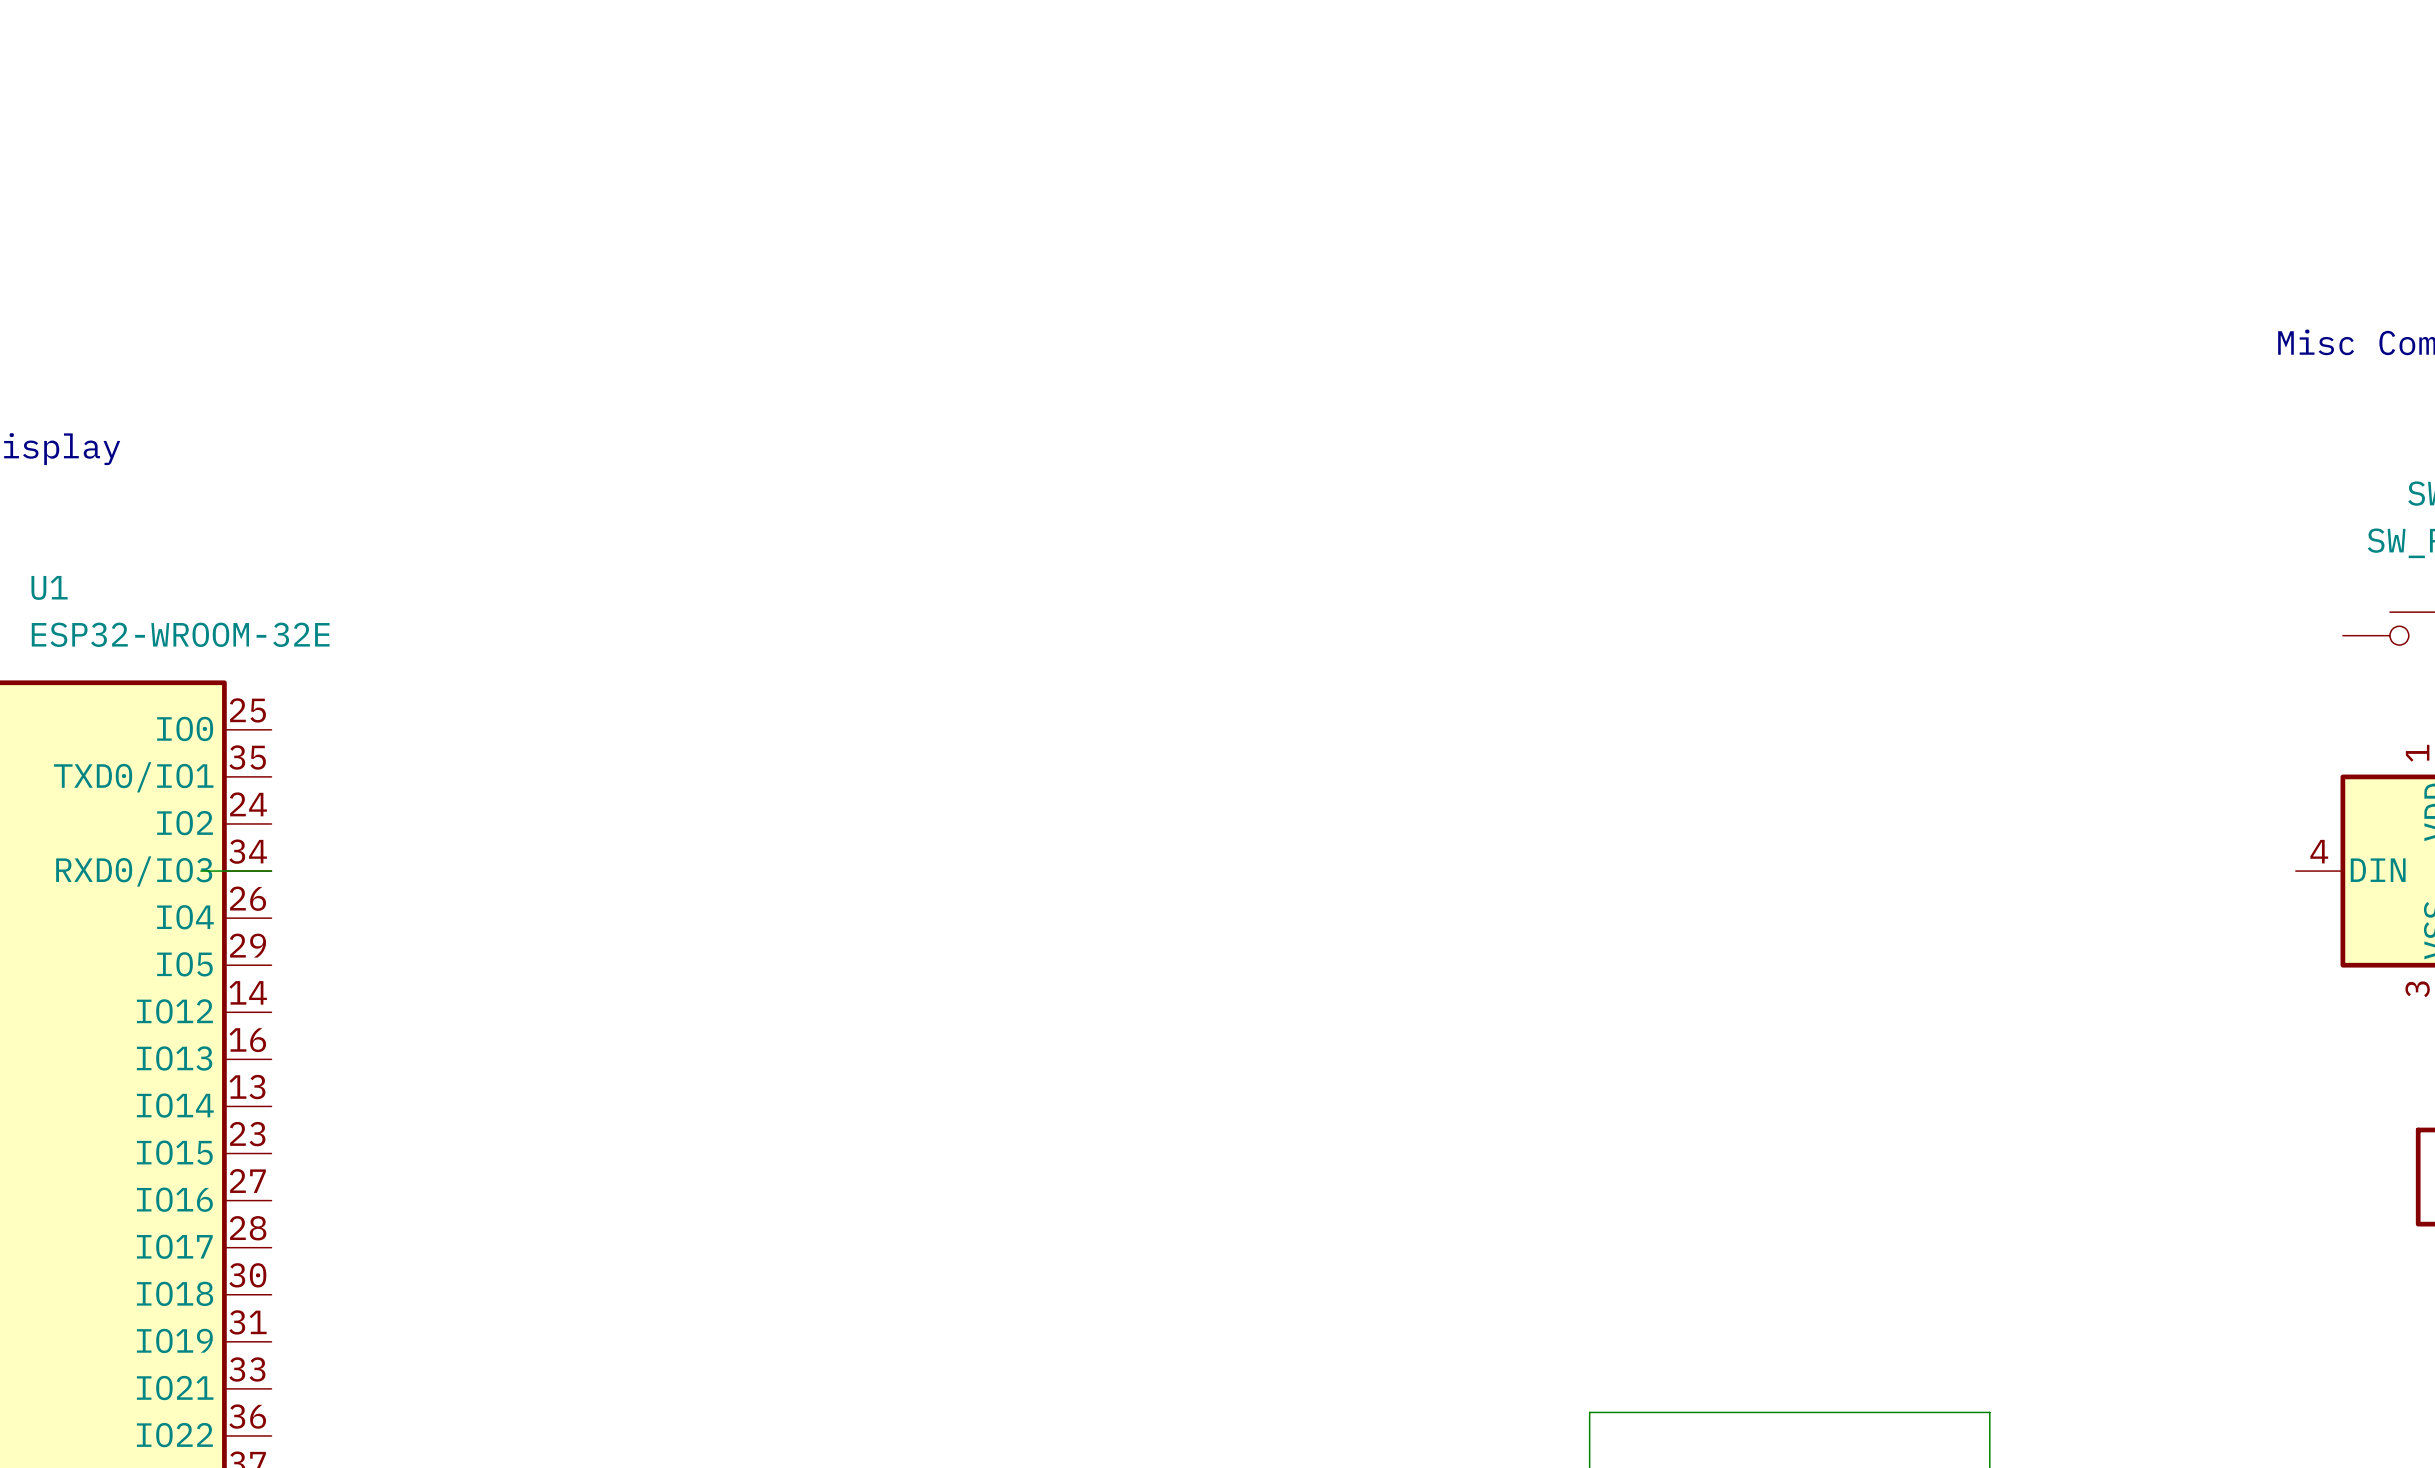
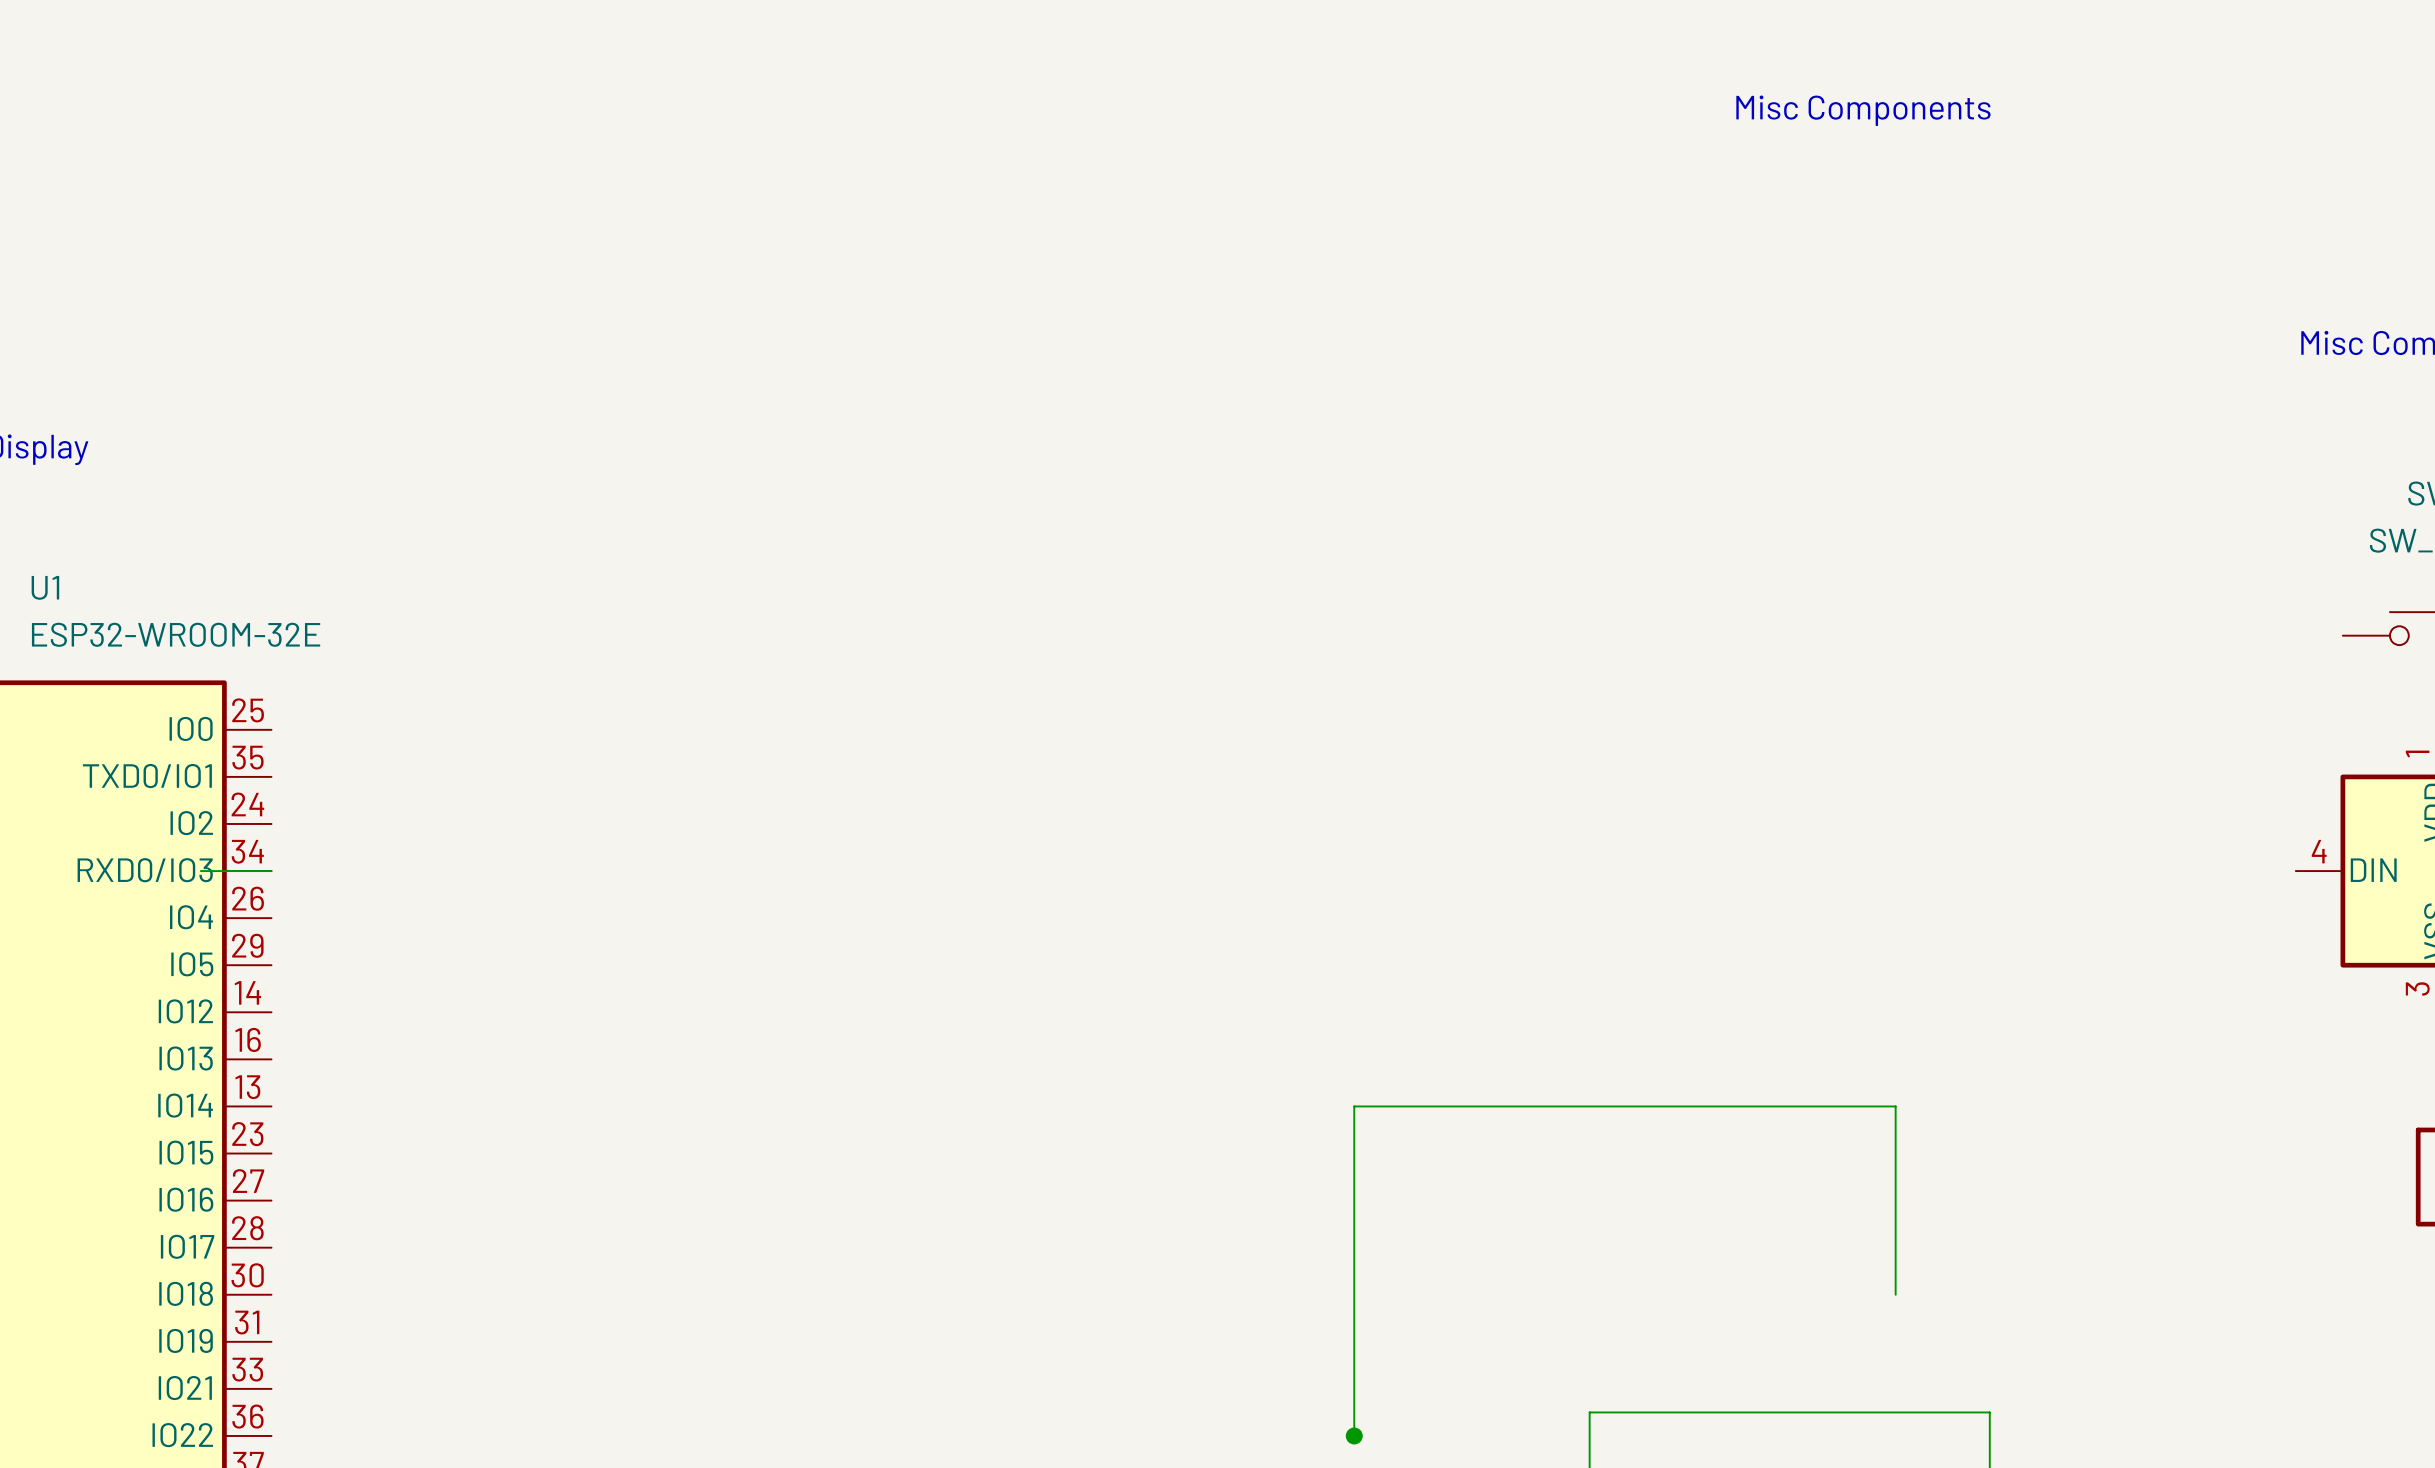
text: none -> Misc Components (1863, 110)
wire: none -> (1895, 1294) (1895, 1106) (1354, 1106) (1354, 1435)
junction: none -> (1354, 1435)

